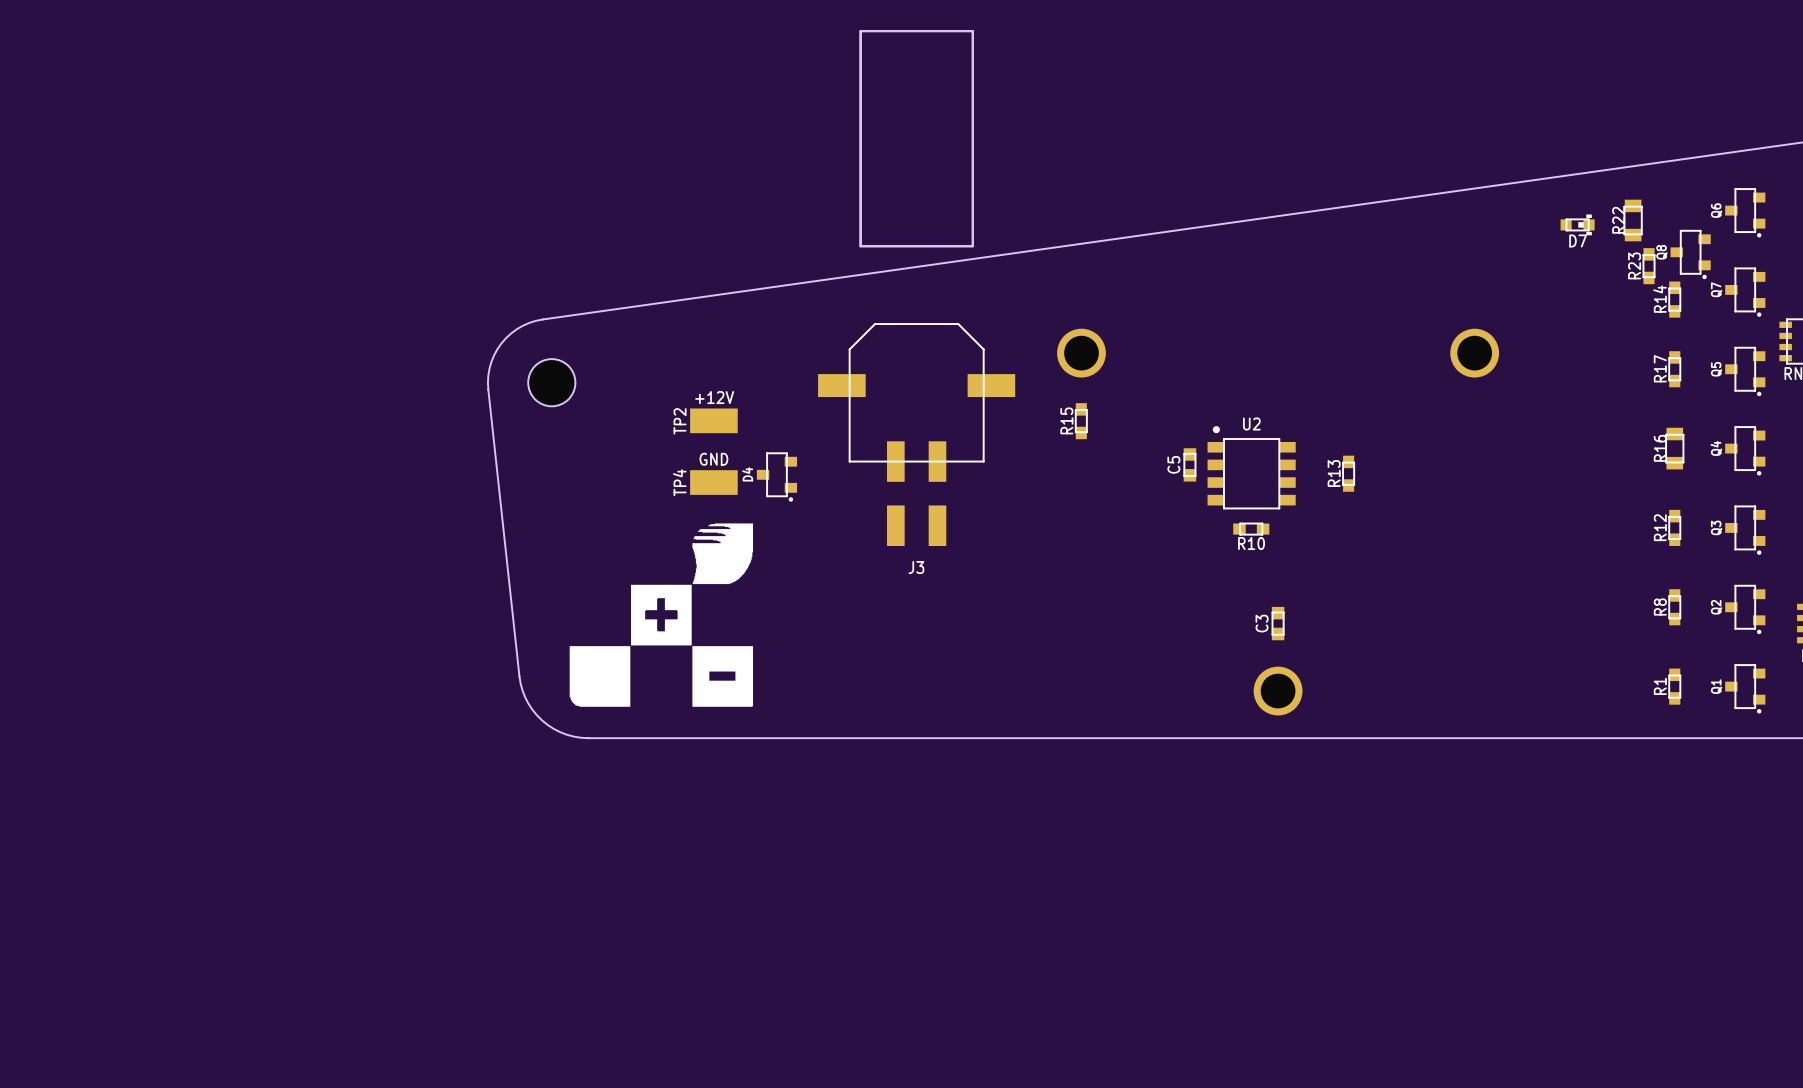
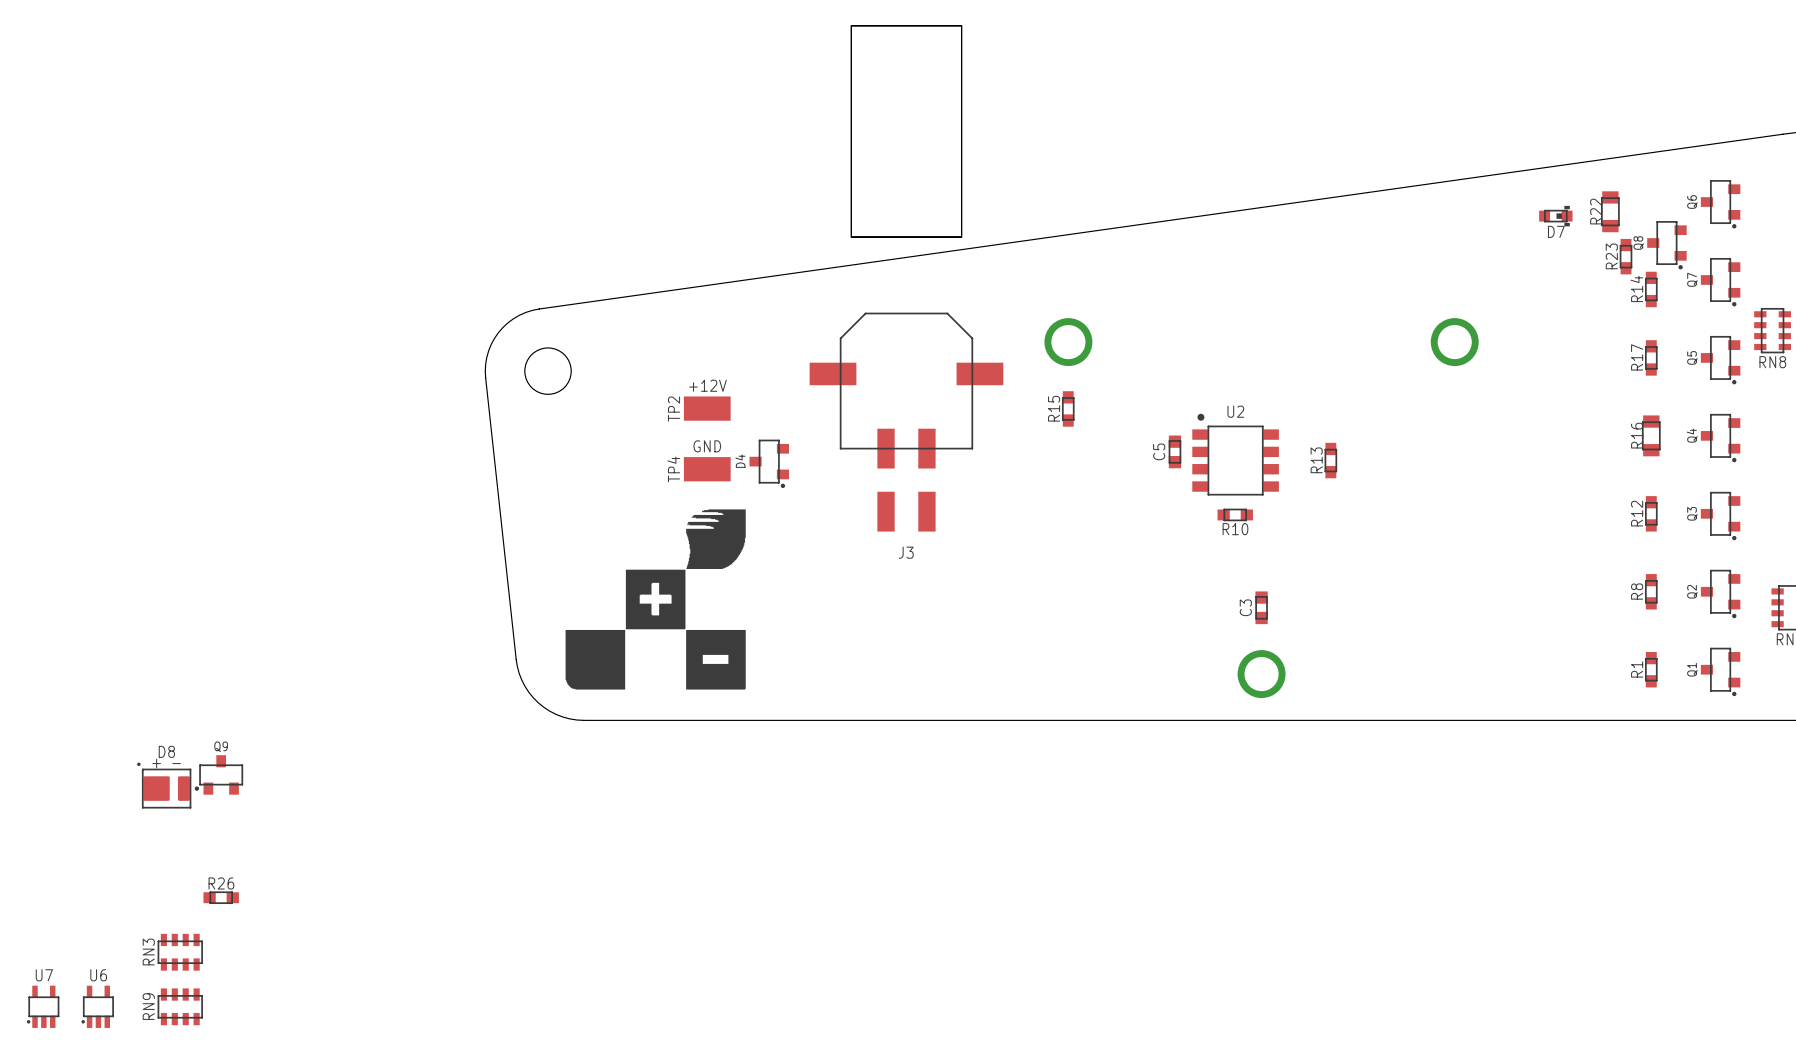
Q9: none -> (218, 774)
D8: none -> (164, 785)
R26: none -> (221, 897)
RN3: none -> (180, 952)
U7: none -> (43, 1006)
U6: none -> (97, 1006)
RN9: none -> (180, 1006)

